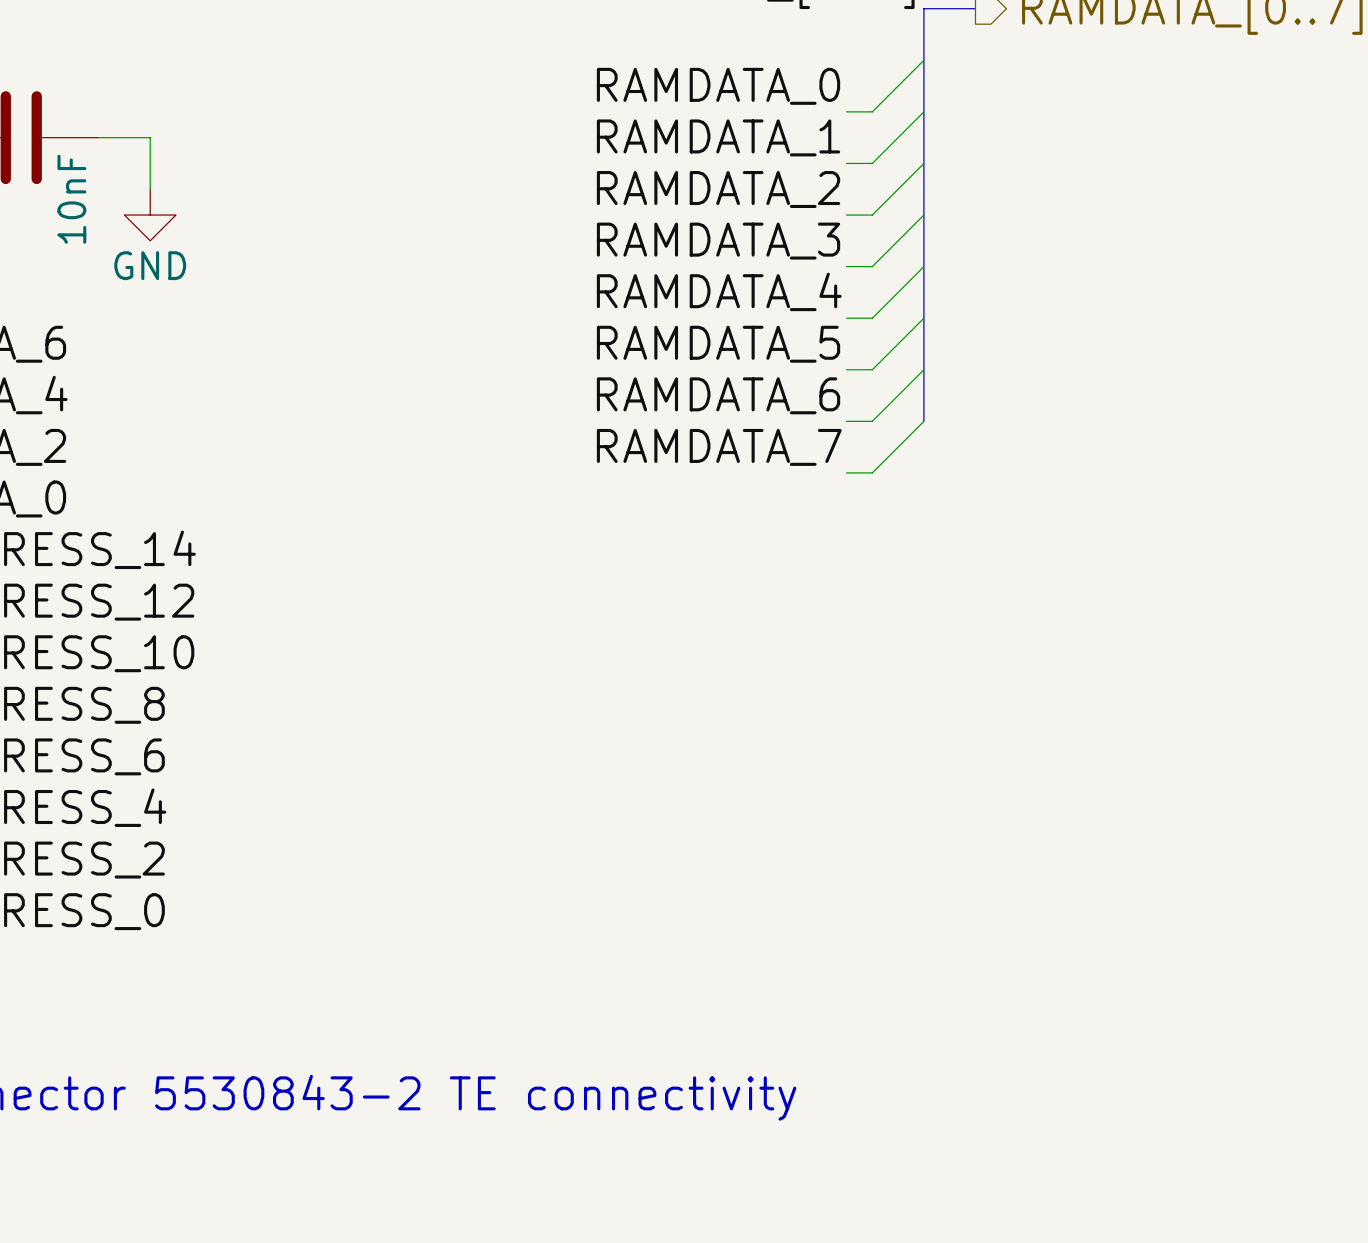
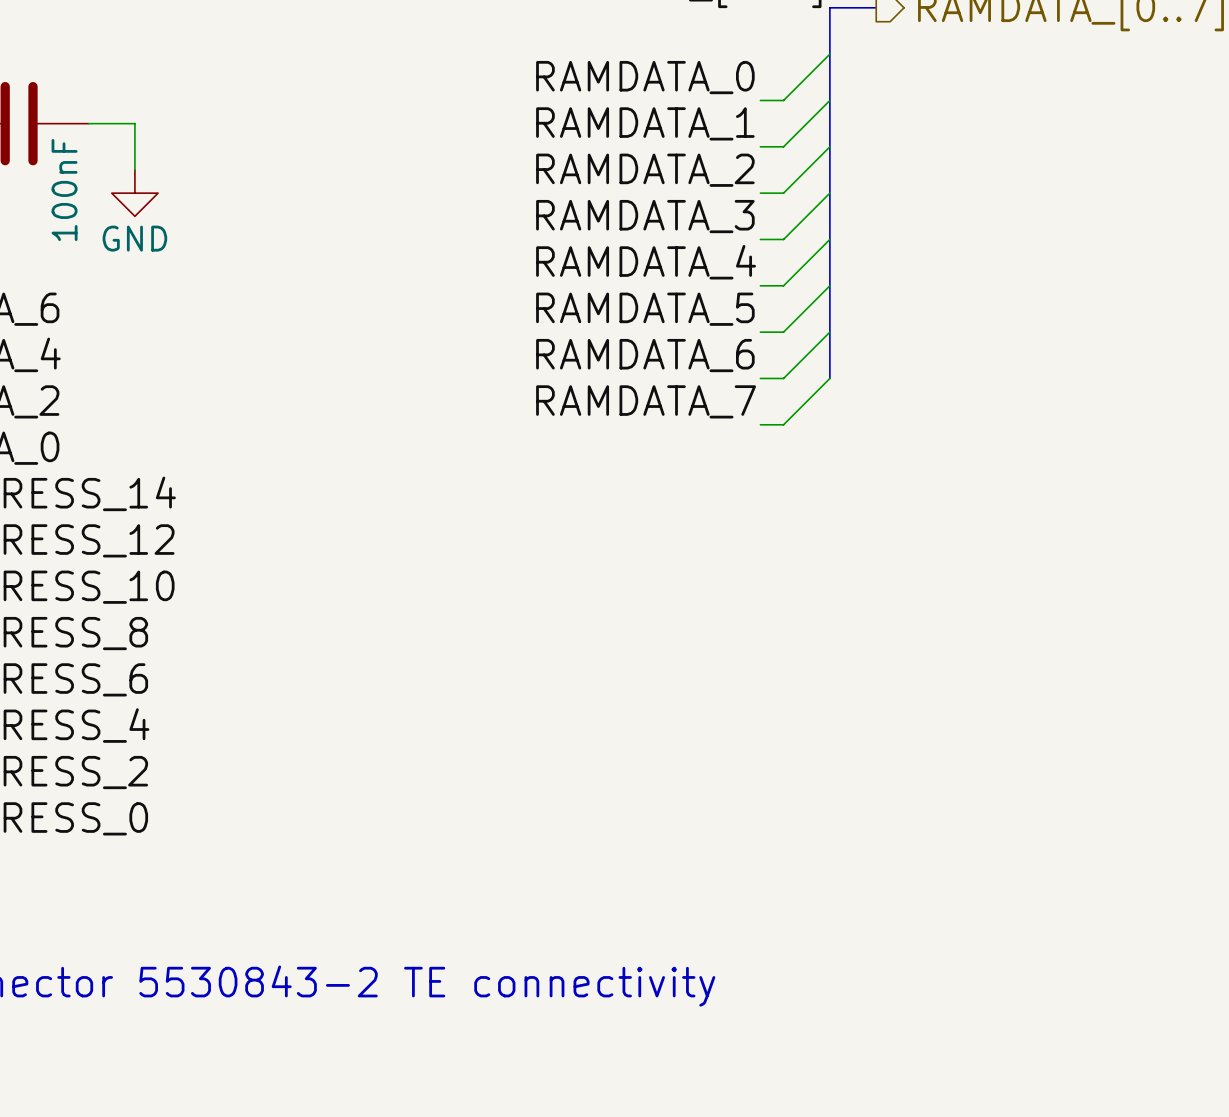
part value: 10nF (71, 199) -> 100nF (64, 190)

